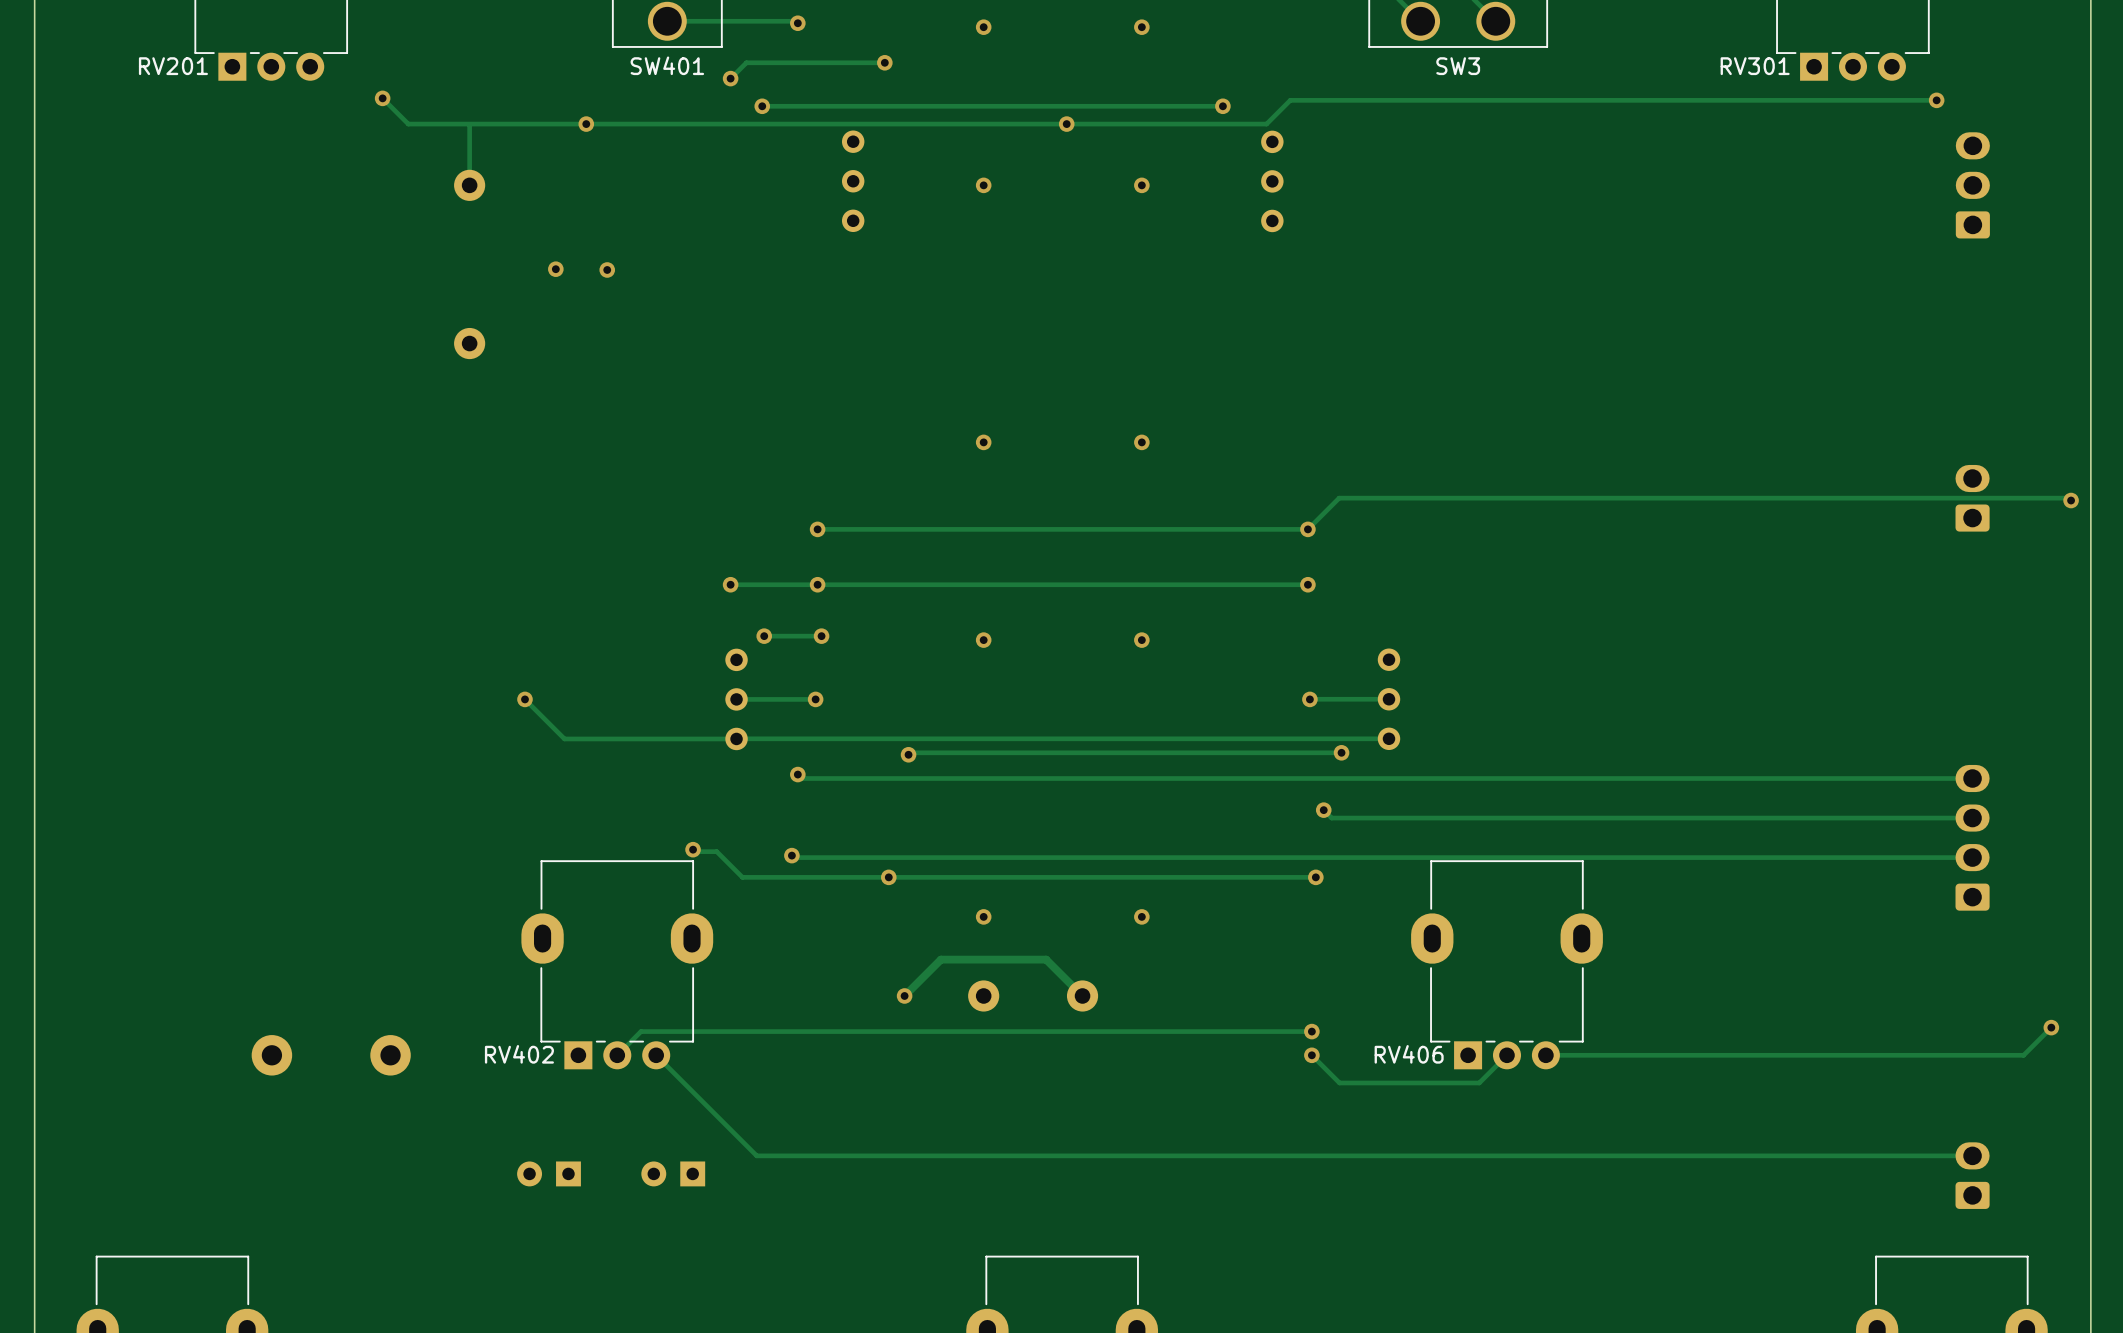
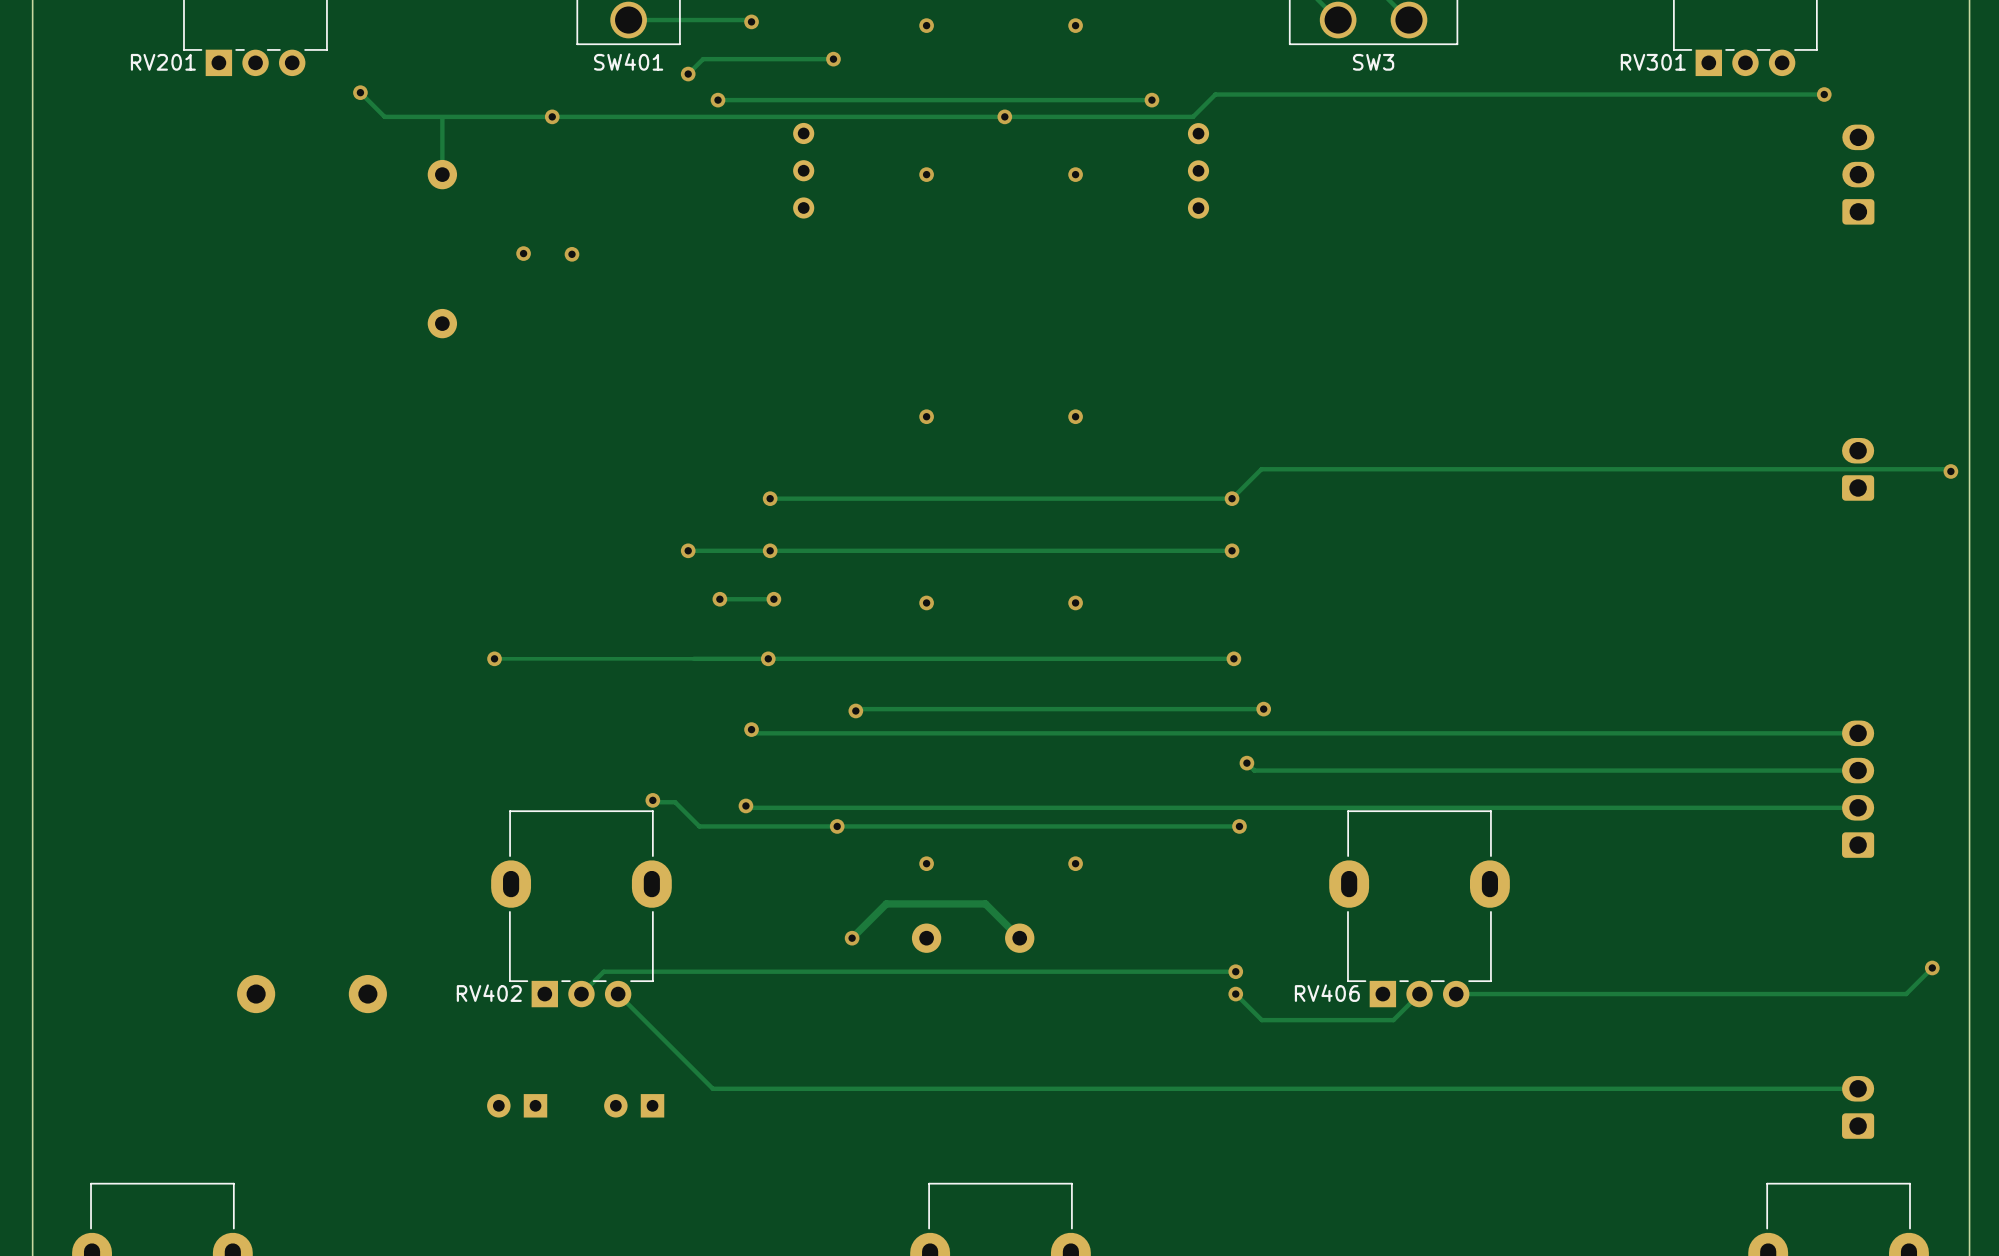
track: (524, 699) (564, 738) (736, 738) -> (494, 658) (693, 658)
part: (736, 699) -> none
track: none -> (768, 658) (1232, 658)
track: (1310, 699) (1388, 699) -> none
part: (1388, 699) -> none
track: (736, 738) (1388, 738) -> none

